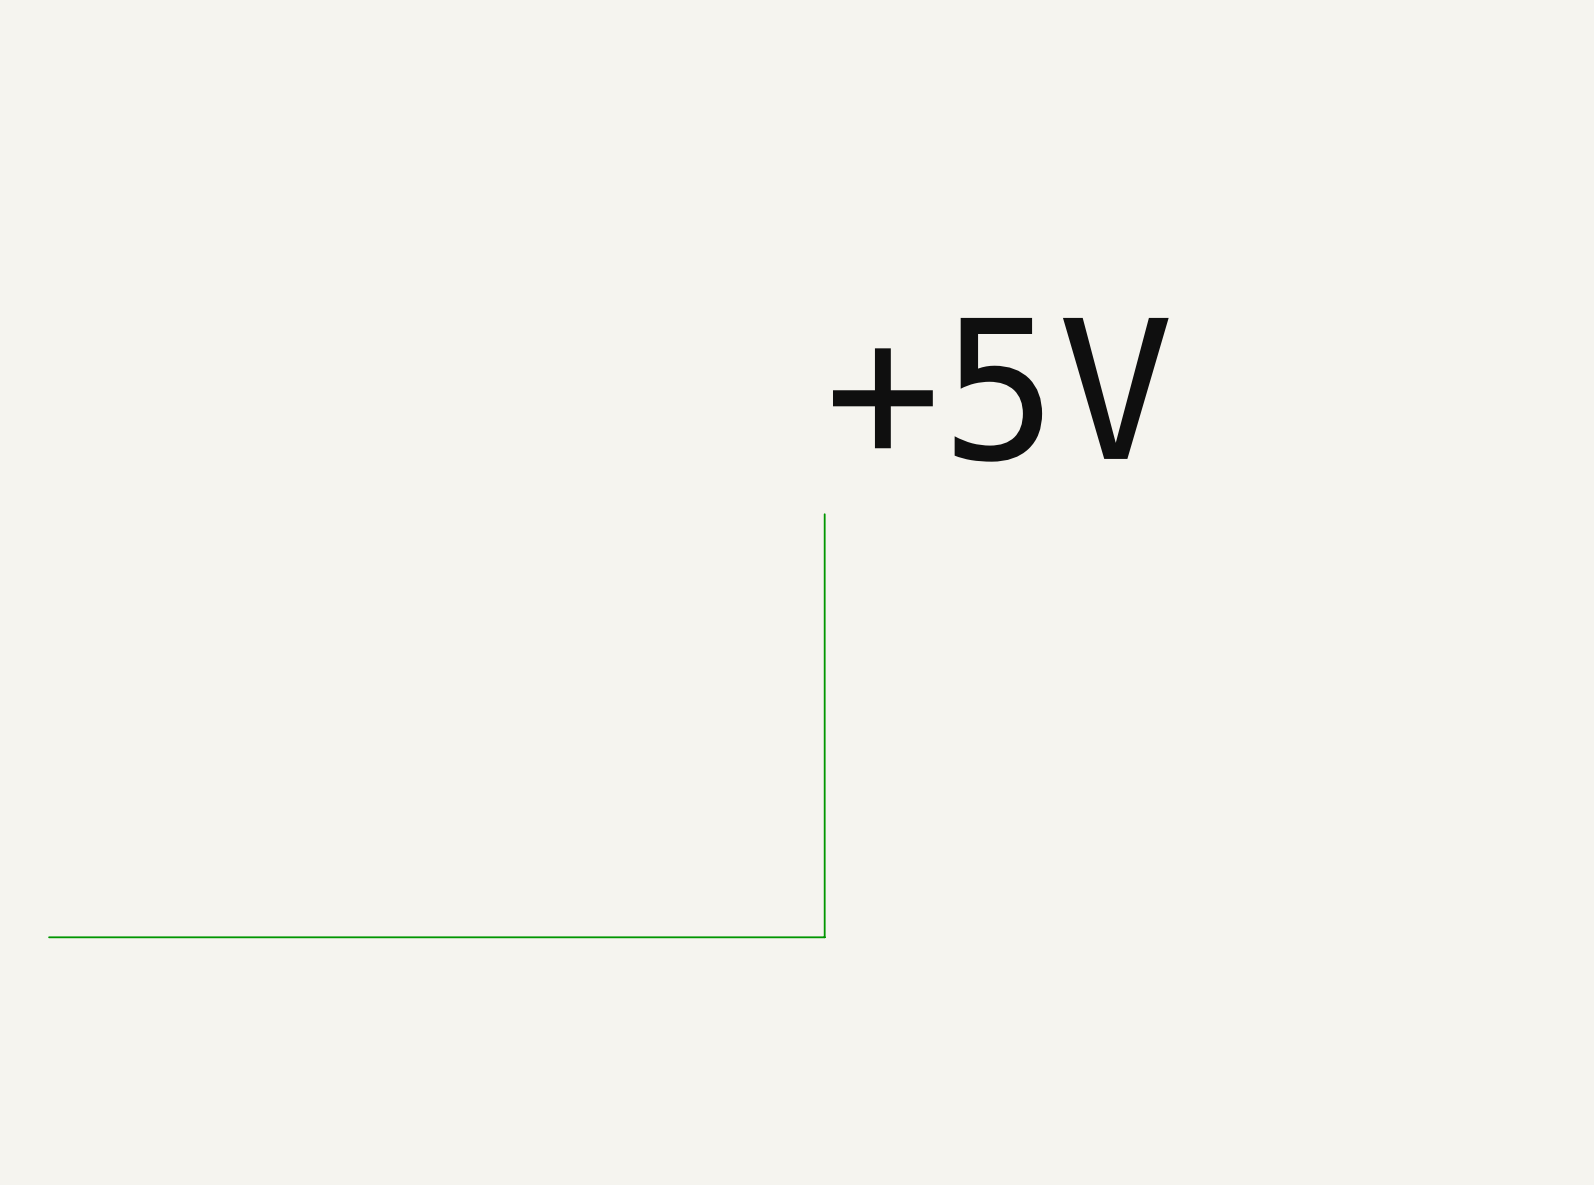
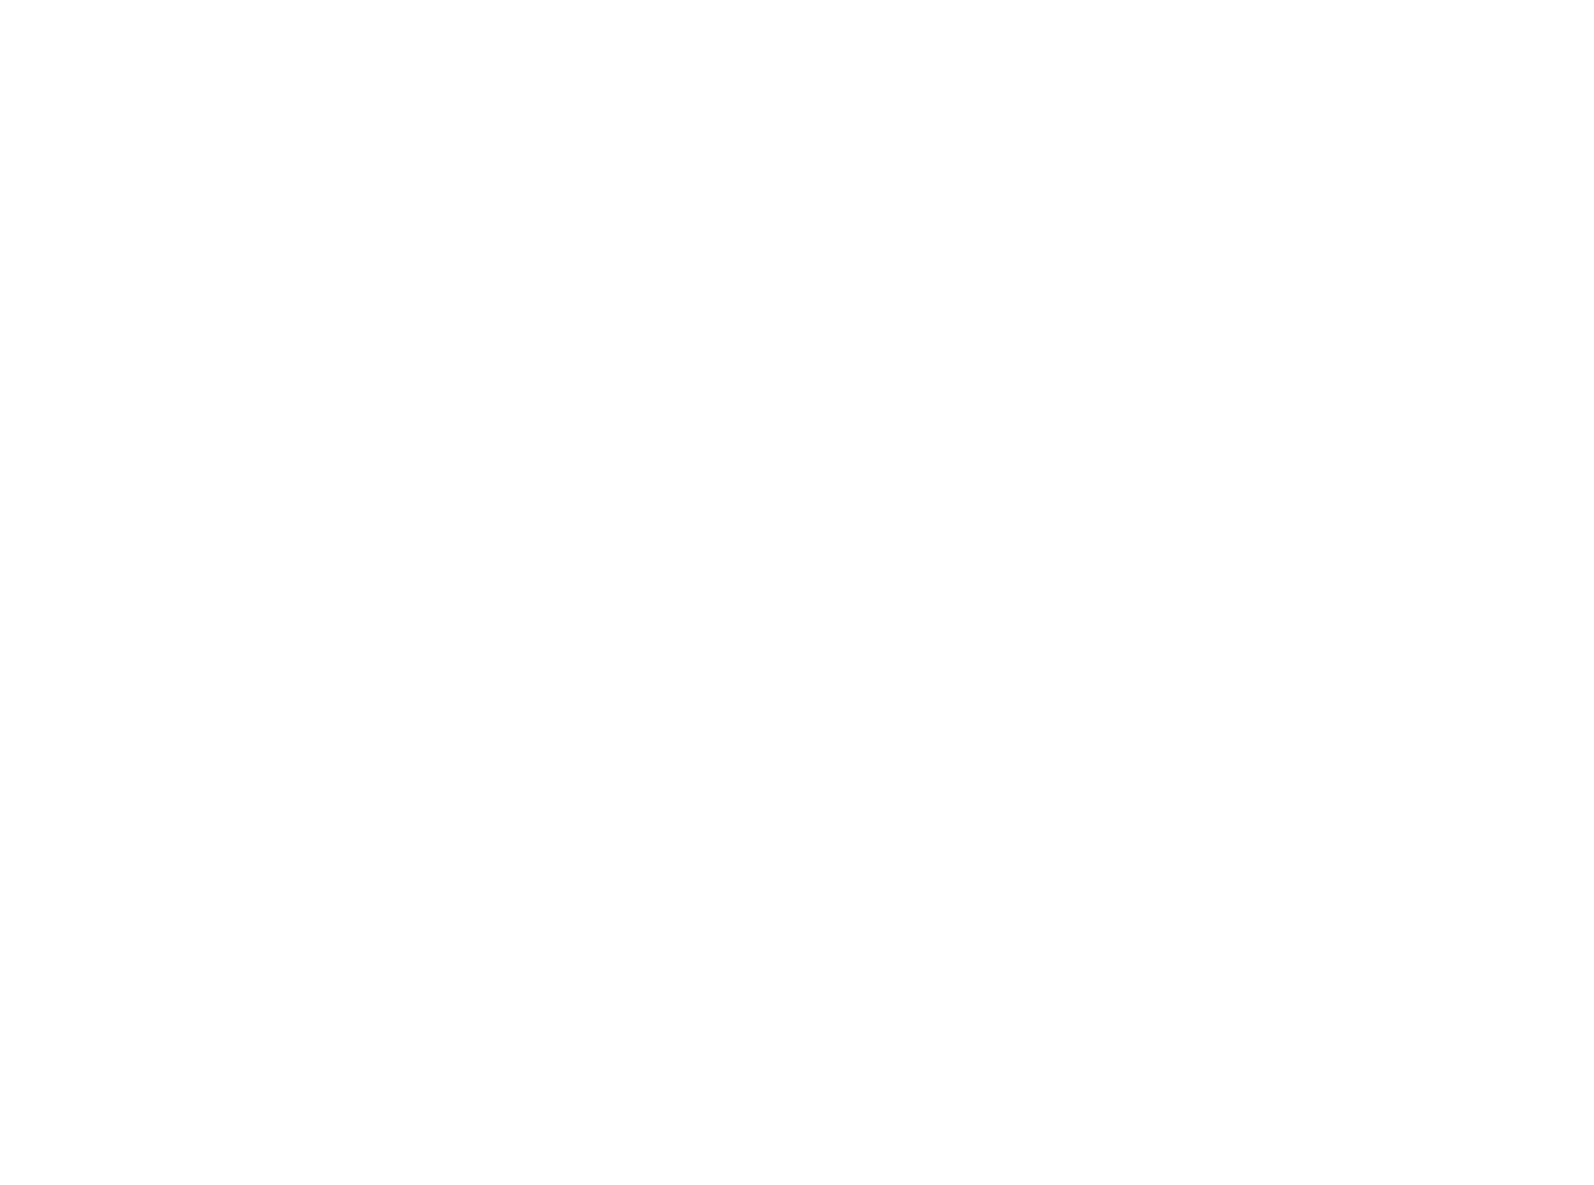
label: +5V (1000, 389) -> none
wire: (824, 514) (824, 937) (49, 937) -> none

